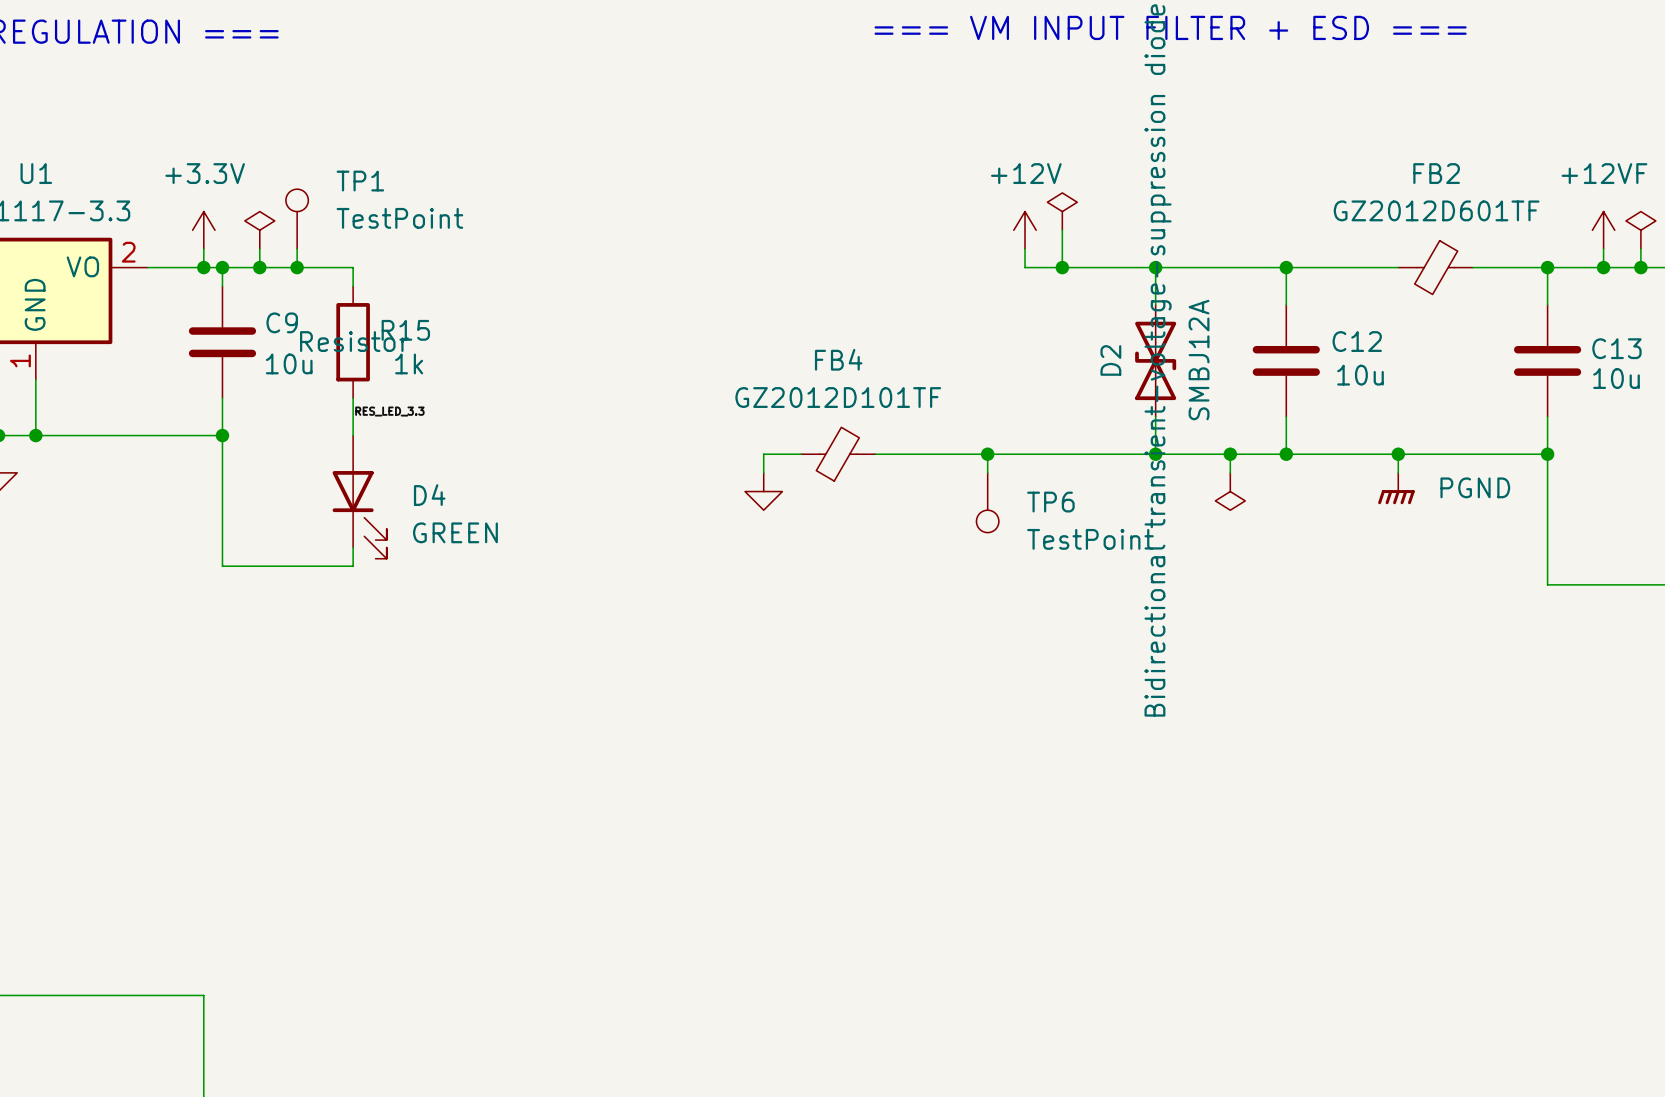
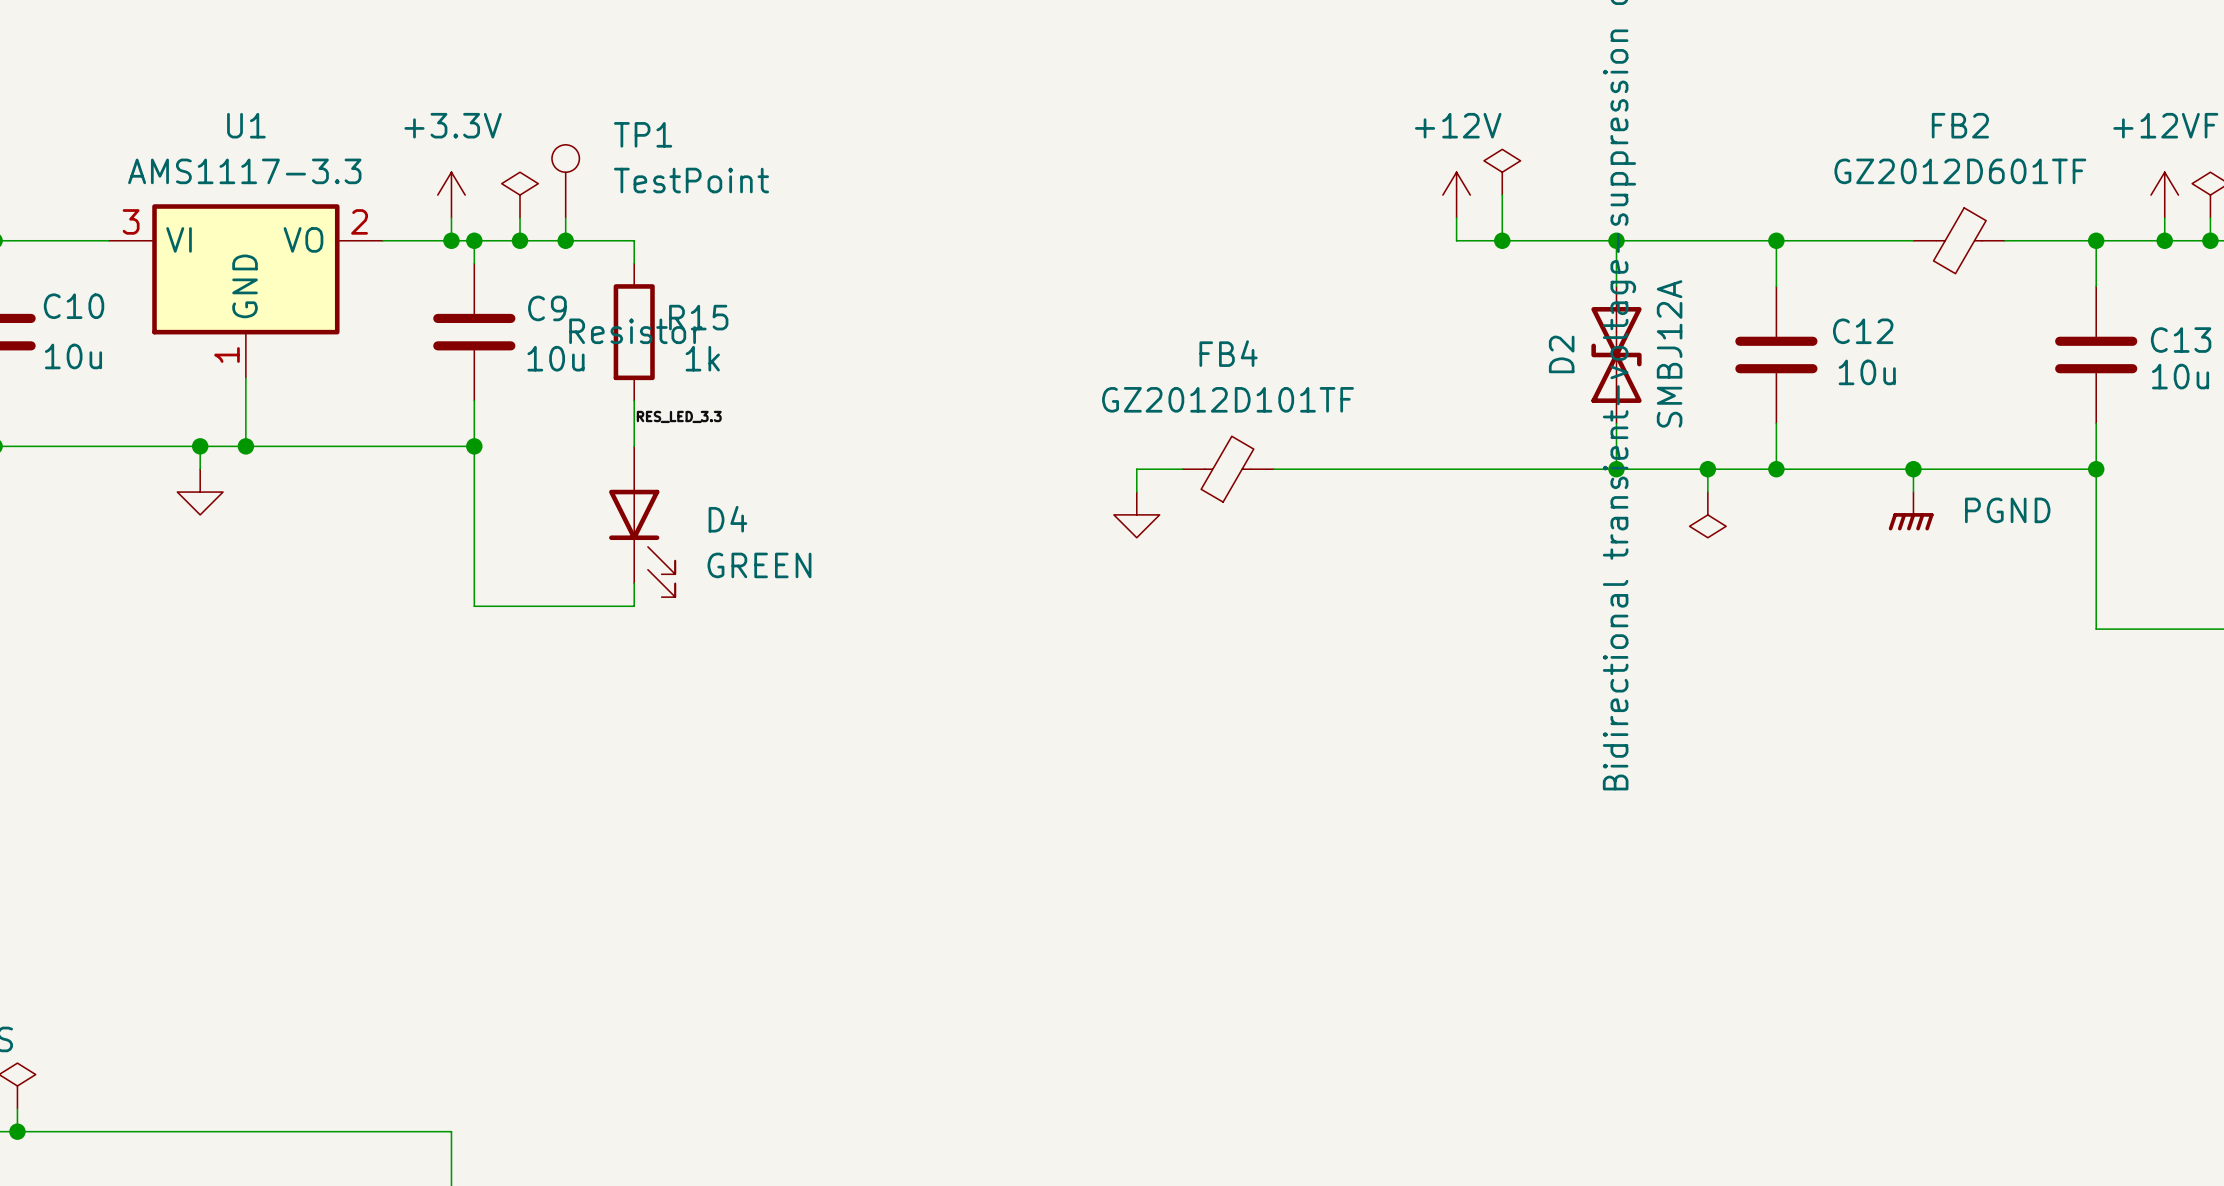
wire: (987, 454) (987, 472) -> none
junction: (987, 454) -> none
TP6: TestPoint (987, 502) -> none

